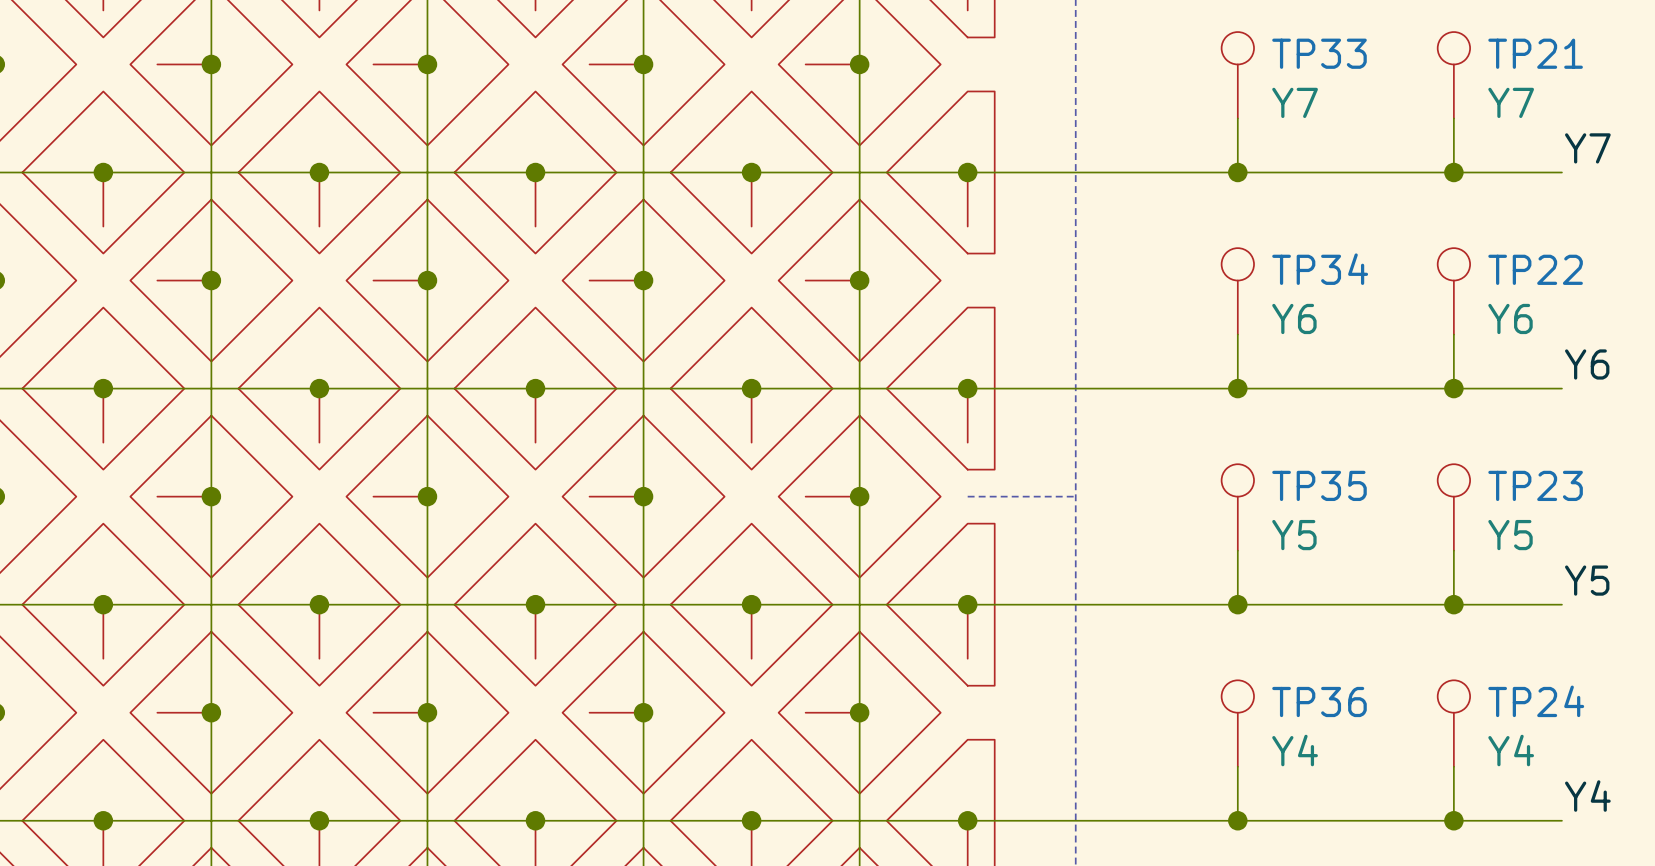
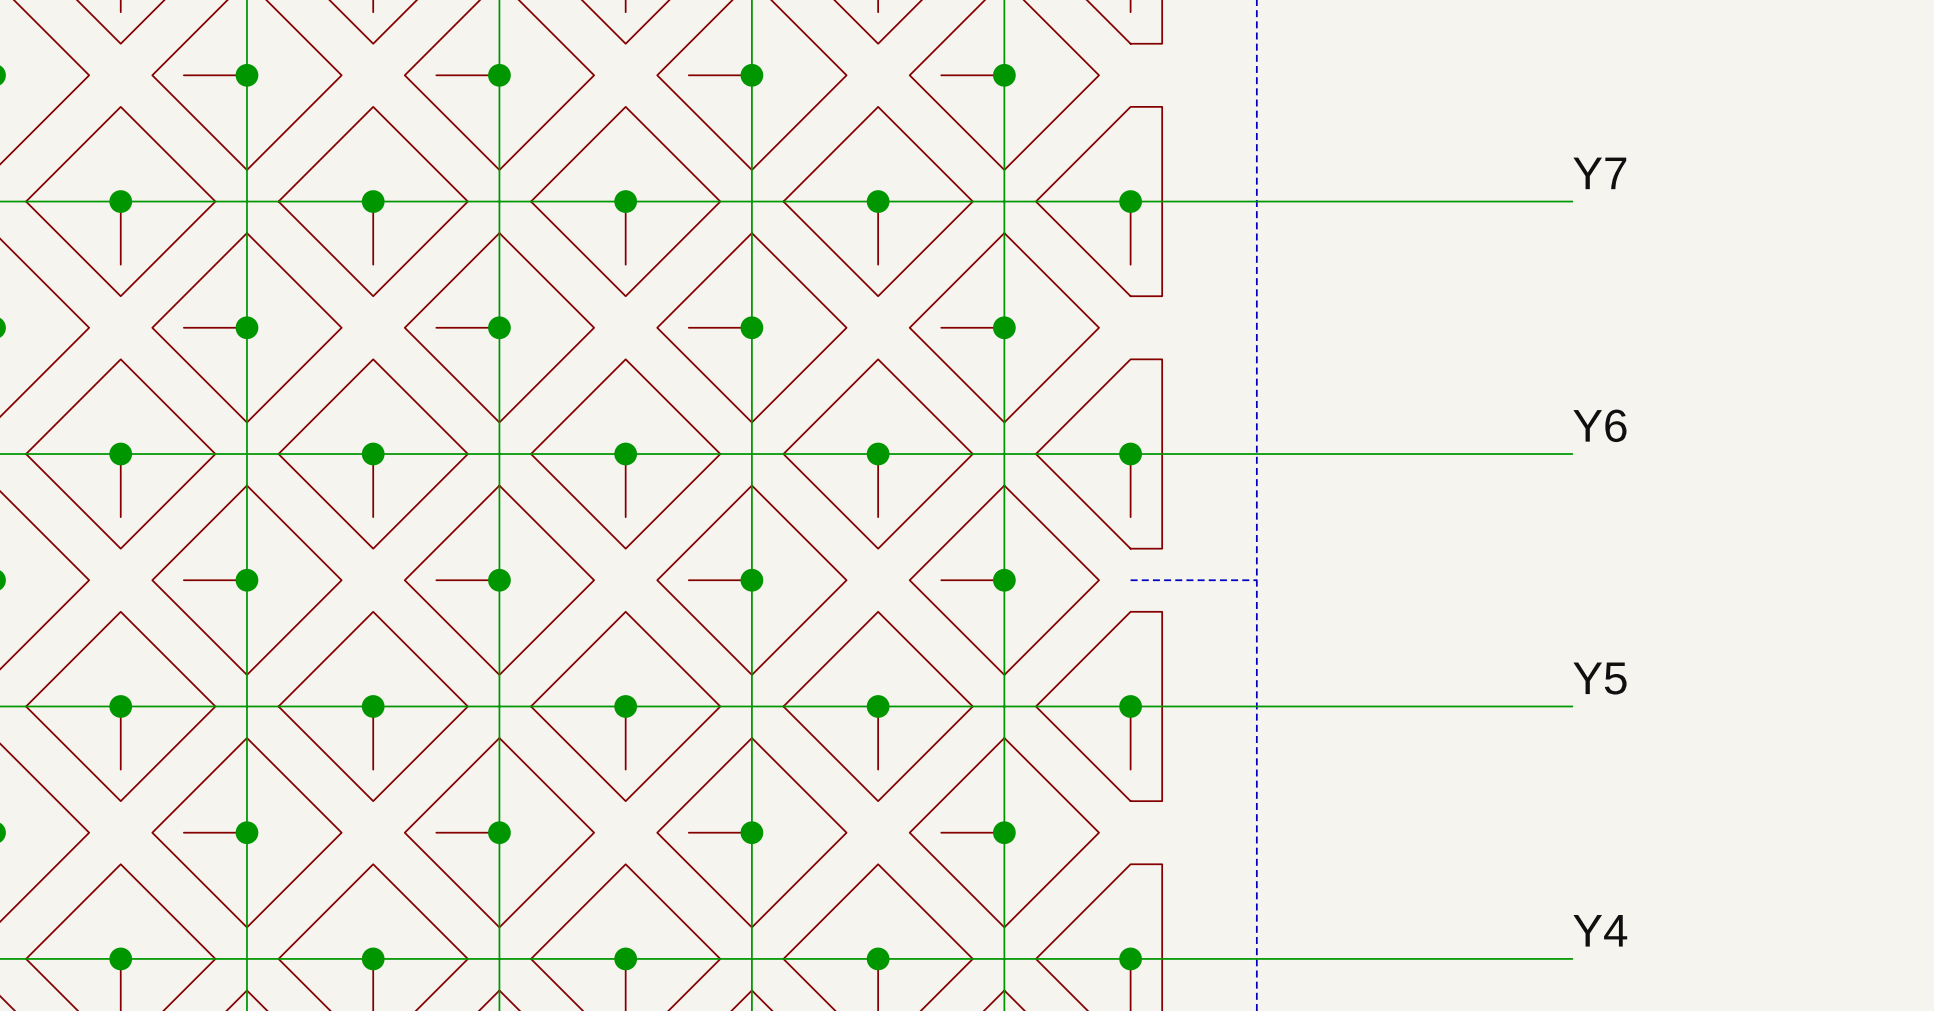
TP33: Y7 (1237, 75) -> none
TP21: Y7 (1453, 75) -> none
wire: (1237, 118) (1237, 172) -> none
wire: (1453, 118) (1453, 172) -> none
label position: Y7 (1587, 148) -> Y7 (1599, 173)
junction: (1237, 172) -> none
wire: (1345, 172) (1561, 172) -> none
junction: (1453, 172) -> none
TP34: Y6 (1237, 291) -> none
TP22: Y6 (1453, 291) -> none
wire: (1237, 334) (1237, 388) -> none
wire: (1453, 334) (1453, 388) -> none
label position: Y6 (1587, 364) -> Y6 (1599, 425)
junction: (1237, 388) -> none
wire: (1345, 388) (1561, 388) -> none
junction: (1453, 388) -> none
TP35: Y5 (1237, 507) -> none
TP23: Y5 (1453, 507) -> none
wire: (1237, 550) (1237, 604) -> none
wire: (1453, 550) (1453, 604) -> none
label position: Y5 (1587, 580) -> Y5 (1600, 678)
junction: (1237, 604) -> none
wire: (1345, 604) (1561, 604) -> none
junction: (1453, 604) -> none
TP36: Y4 (1237, 723) -> none
TP24: Y4 (1453, 723) -> none
wire: (1237, 766) (1237, 820) -> none
wire: (1453, 766) (1453, 820) -> none
label position: Y4 (1587, 796) -> Y4 (1600, 930)
junction: (1237, 820) -> none
wire: (1345, 820) (1561, 820) -> none
junction: (1453, 820) -> none

